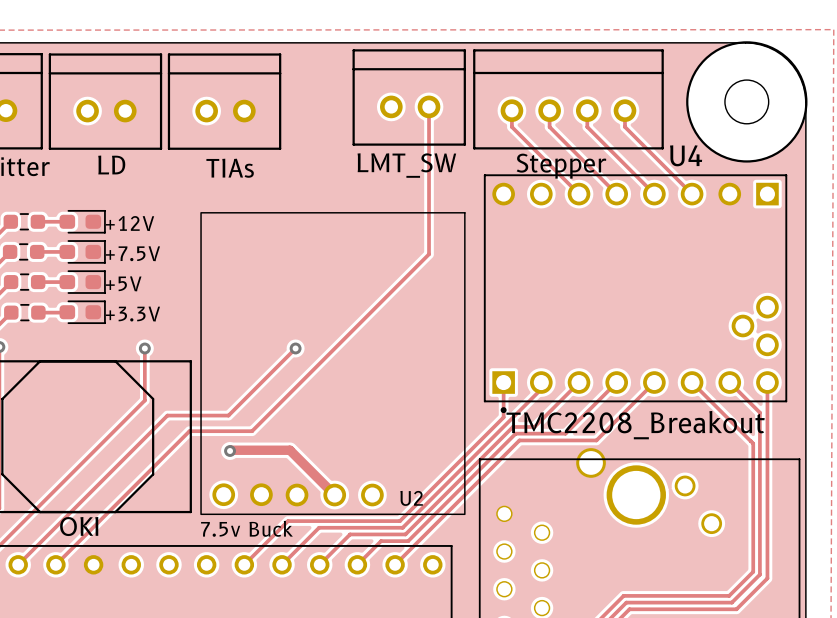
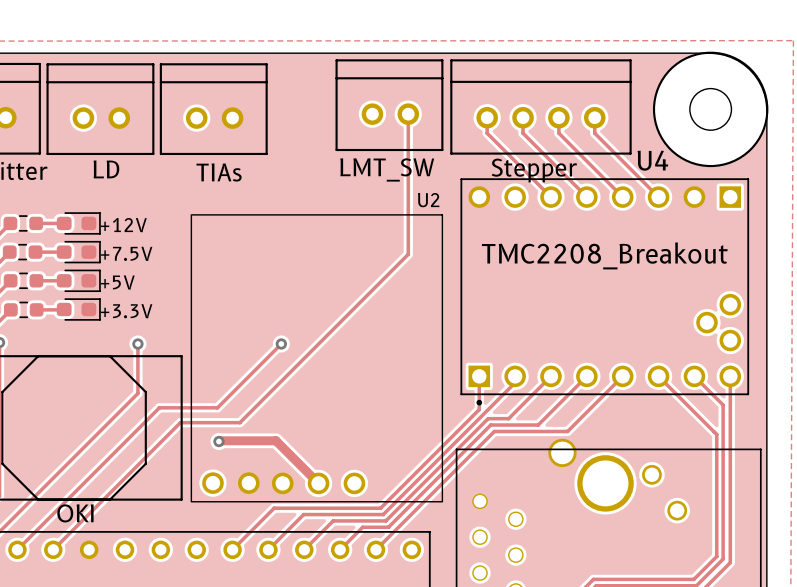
U4 value position: TMC2208_Breakout (635, 425) -> TMC2208_Breakout (604, 255)
U2 name position: U2 (411, 498) -> U2 (428, 200)
text: 7.5v Buck (246, 528) -> none

